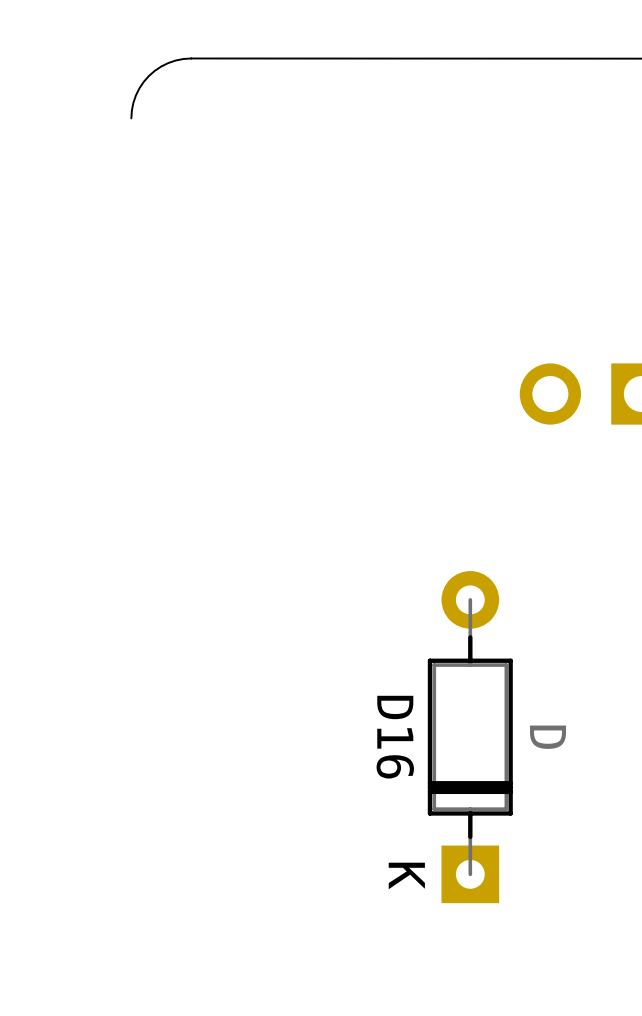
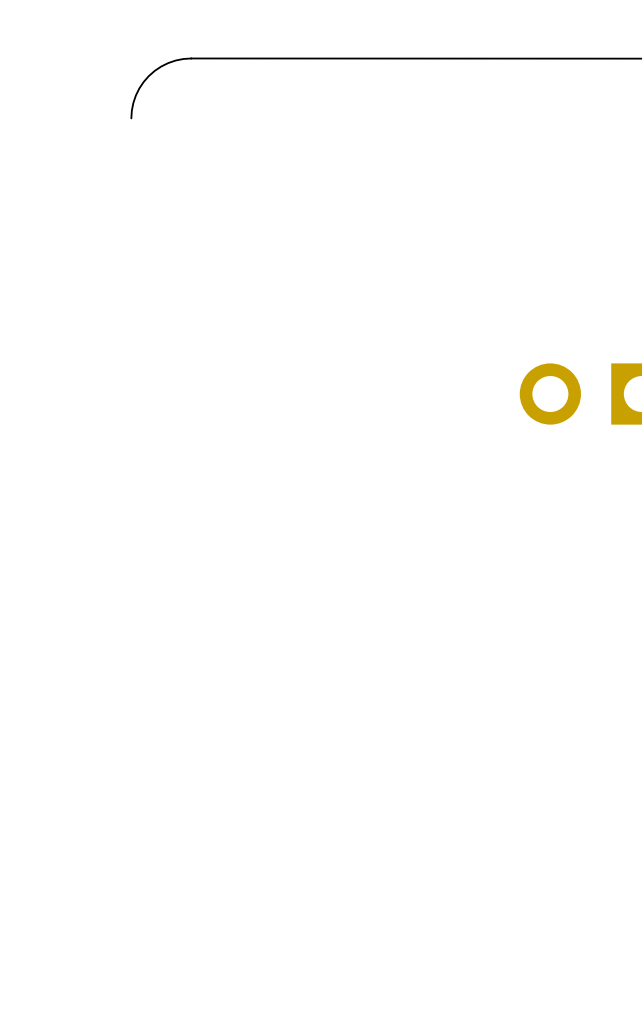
D16: D (470, 737) -> none

